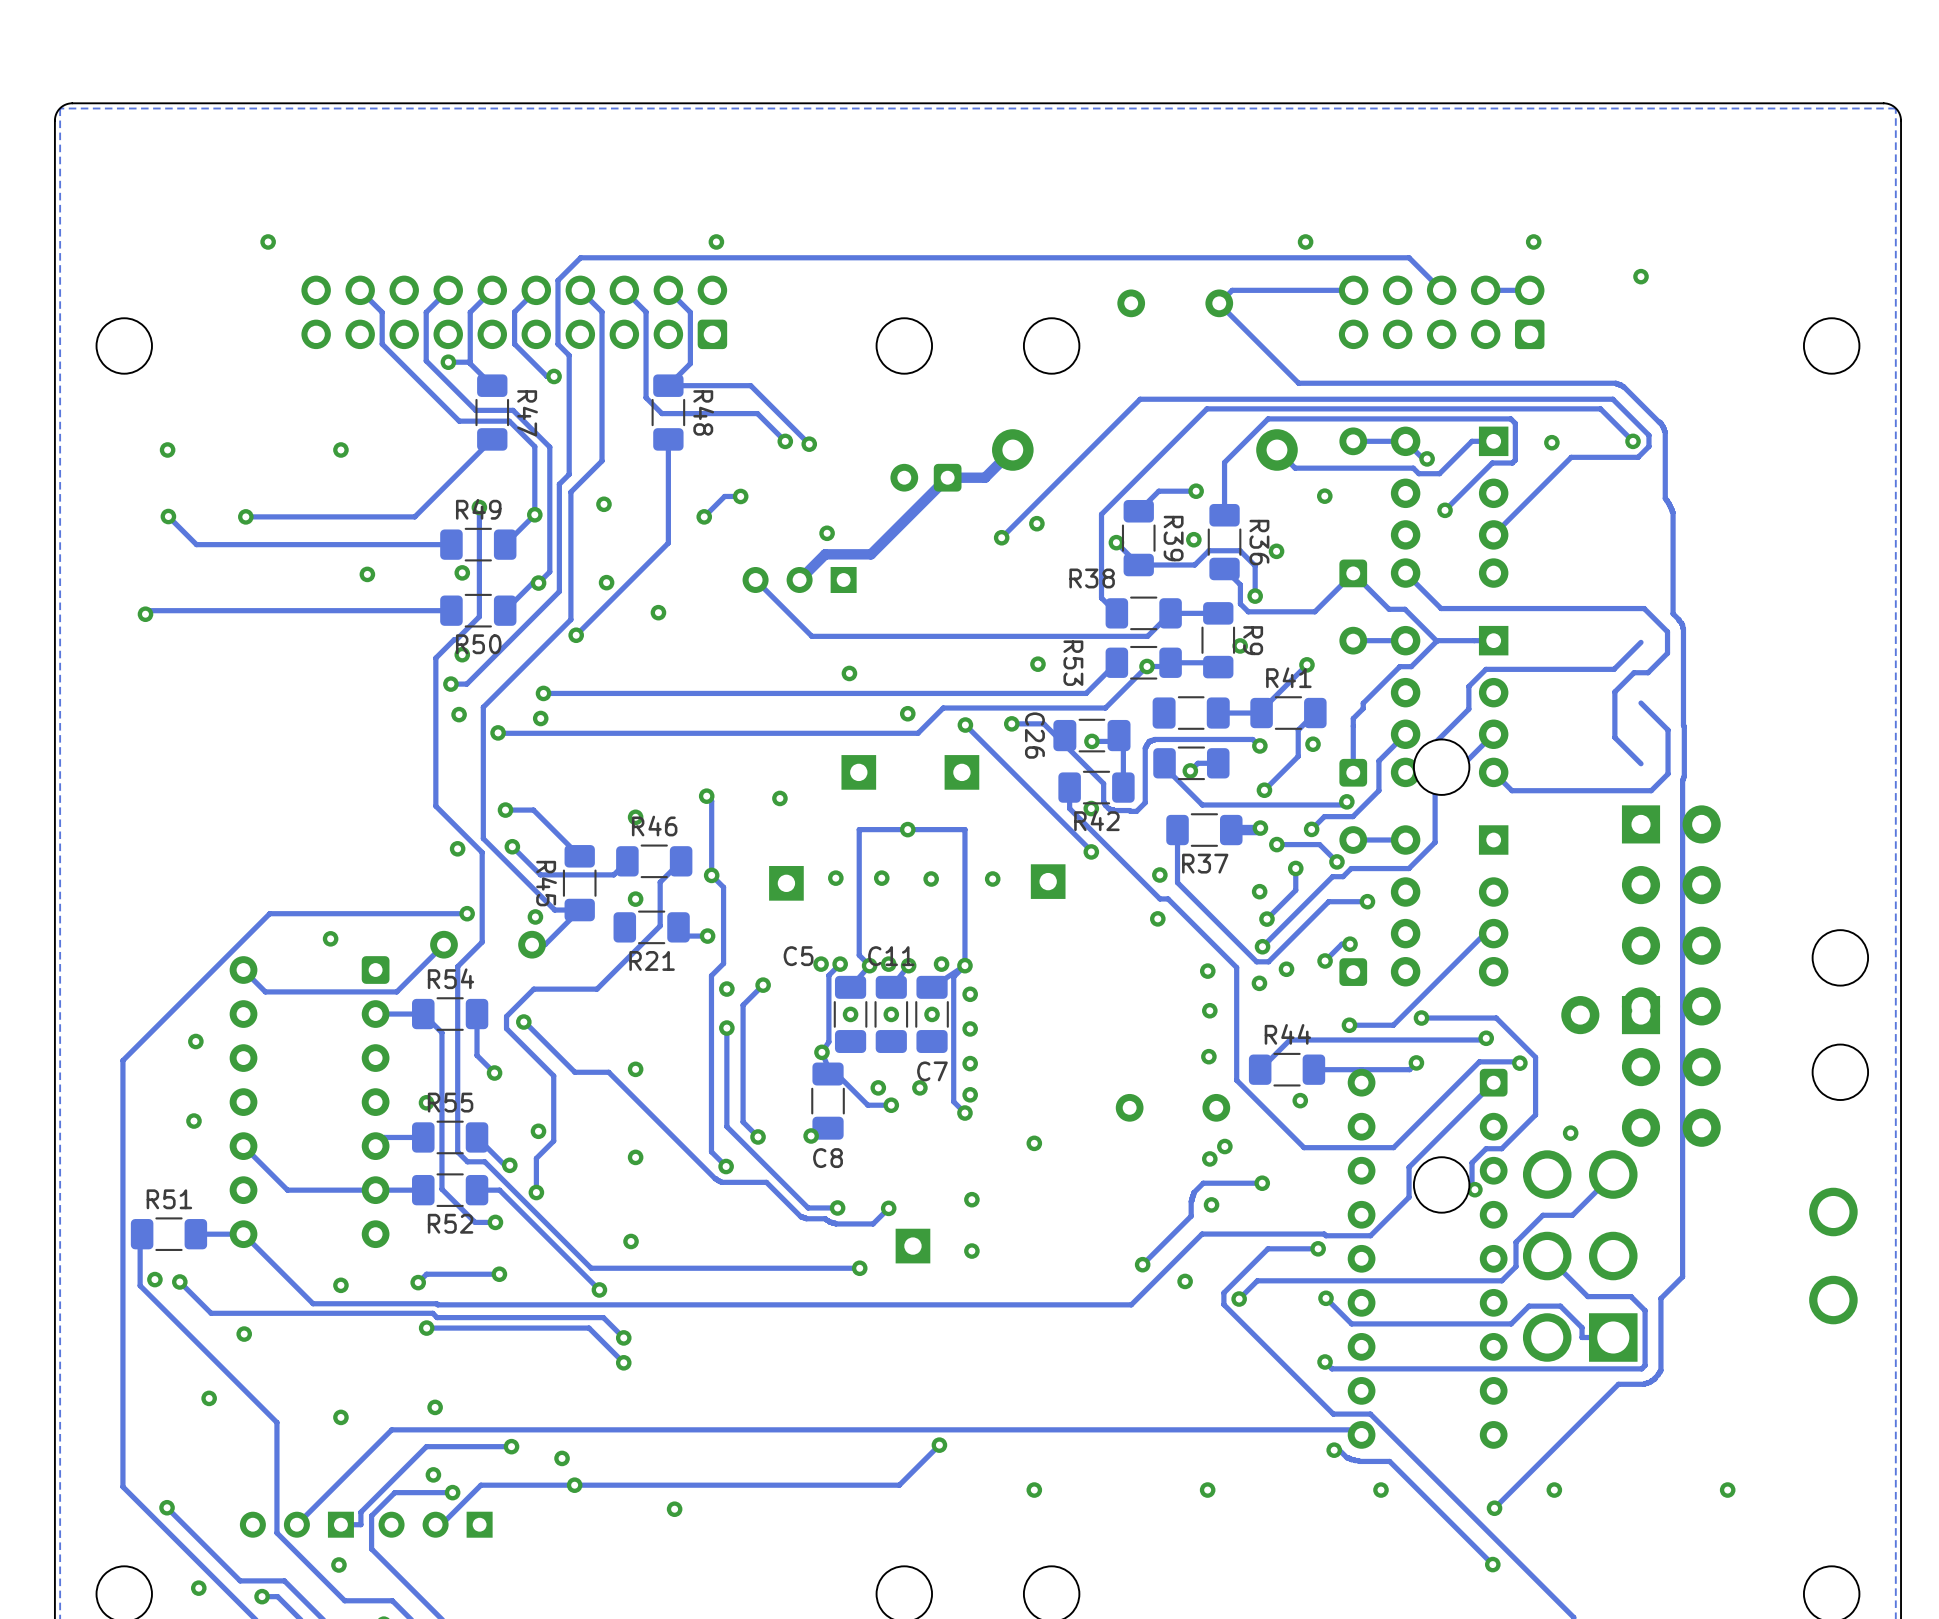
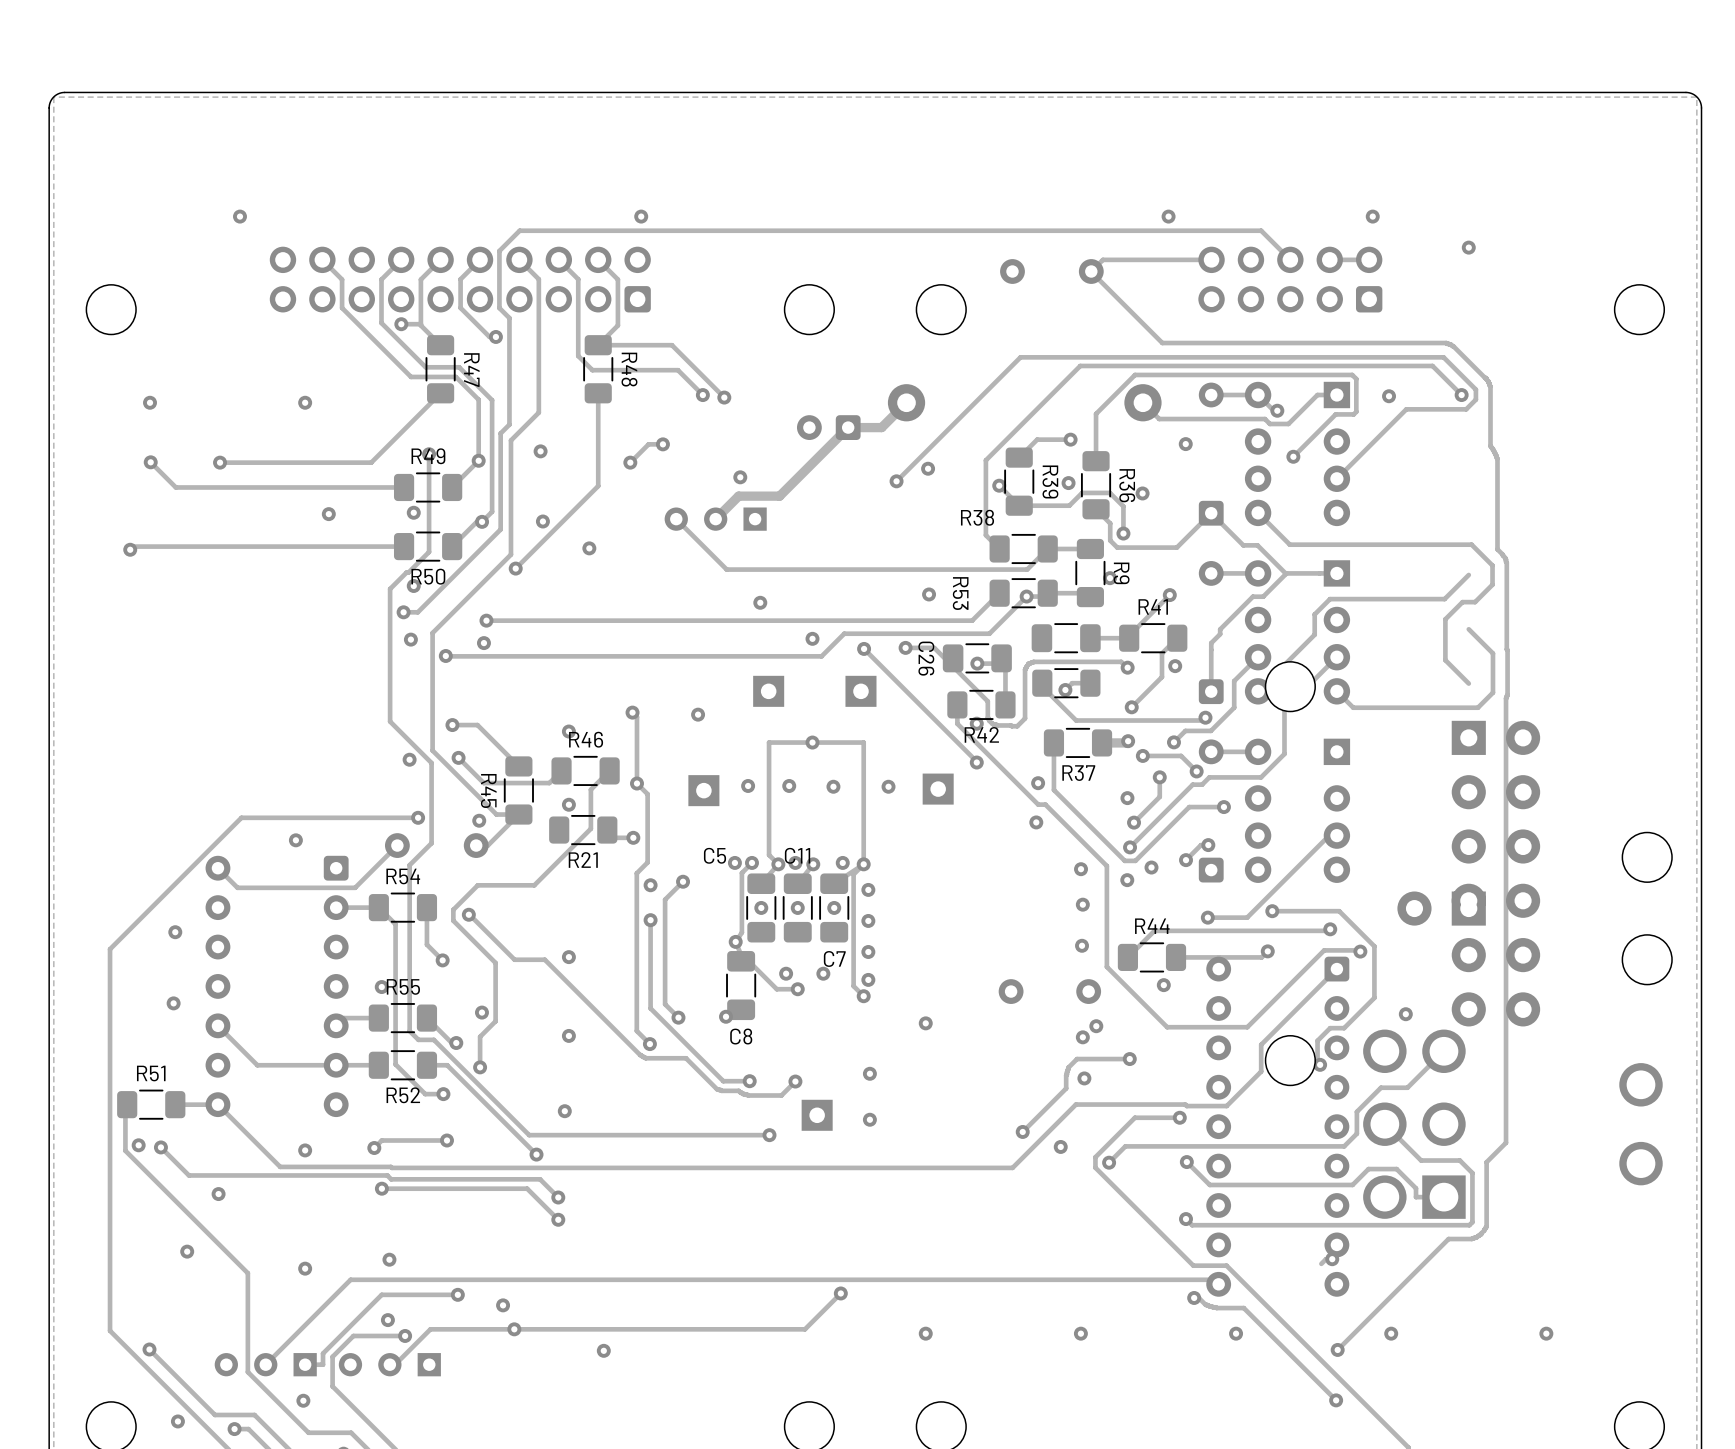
track: none -> (1332, 1259) (1326, 1259) (1321, 1263)
via: none -> (1332, 1259)

